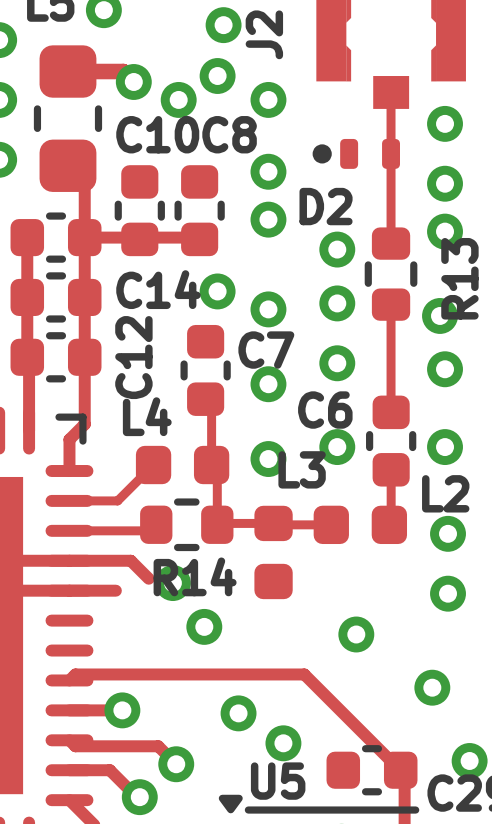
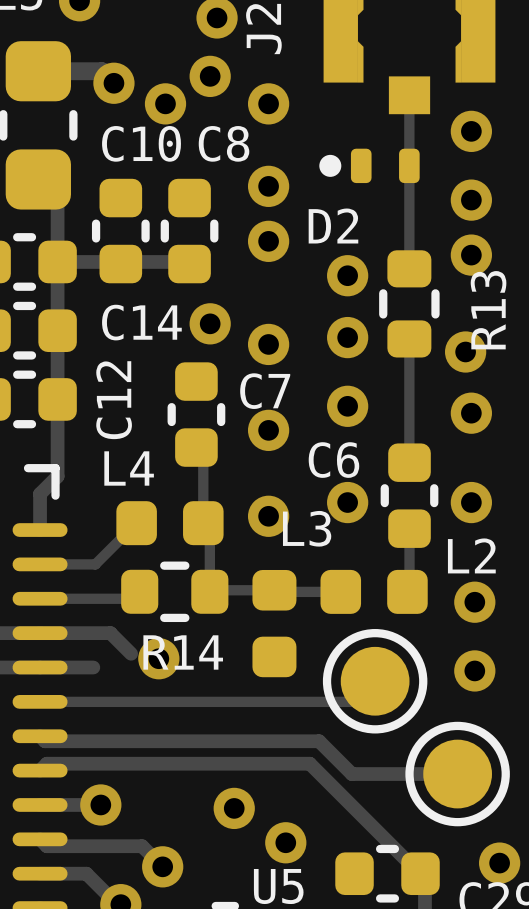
track: none -> (375, 681) (354, 701) (40, 701)
part: none -> (375, 681)
via: (204, 626) -> none
via: (356, 634) -> none
track: none -> (40, 736) (45, 741) (319, 741) (351, 774) (457, 774)
part: none -> (457, 774)
via: (432, 687) -> none

